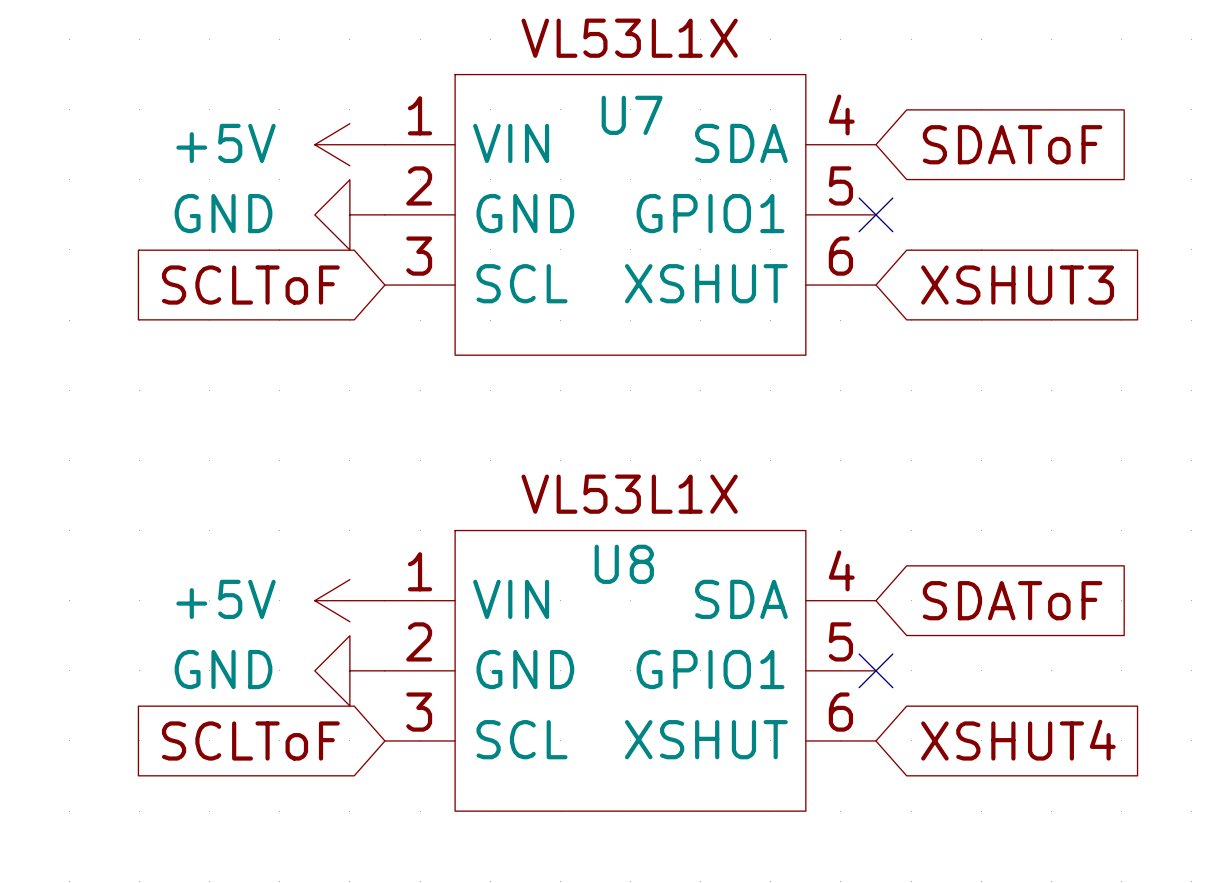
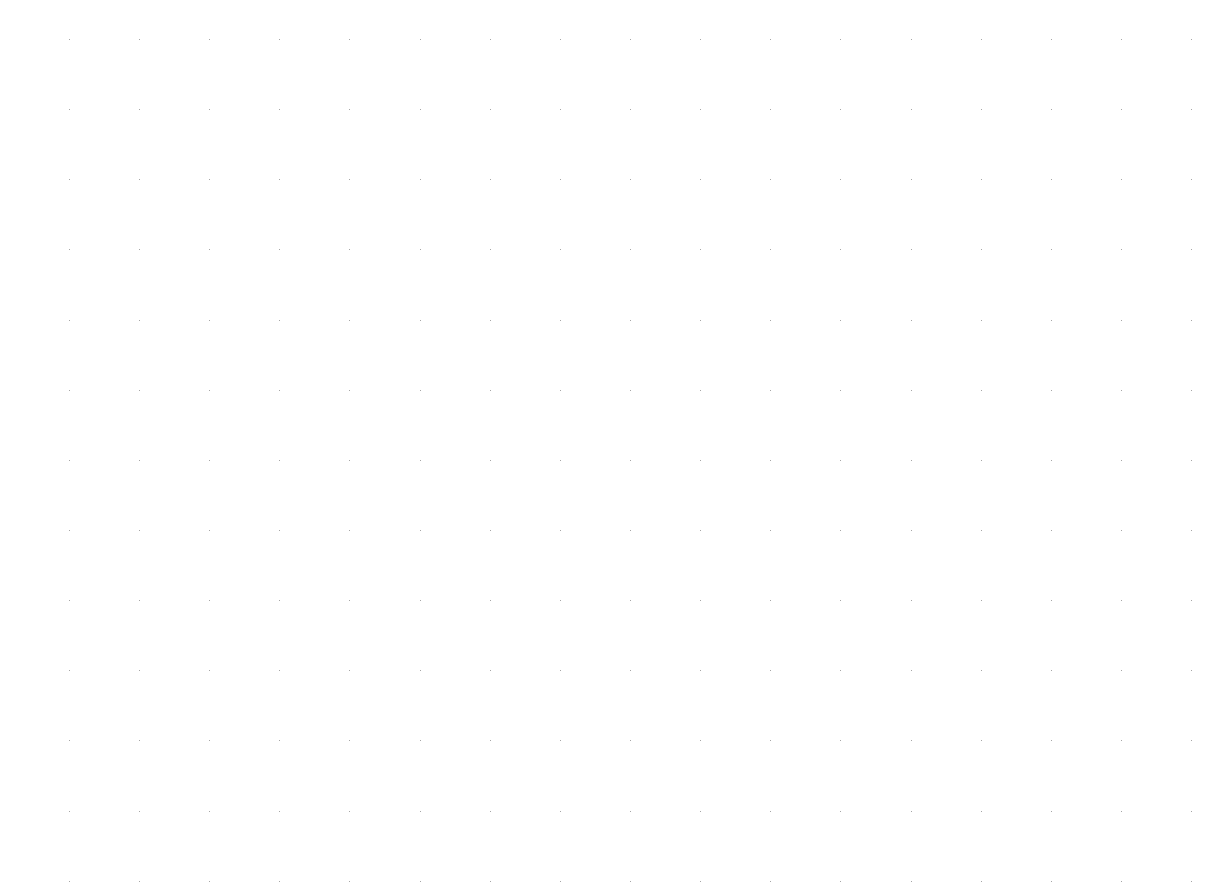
power symbol: +5V (349, 144) -> none
global label: SDAToF (1012, 144) -> none
power symbol: GND (349, 214) -> none
U7: (630, 214) -> none
no-connect mark: (875, 214) -> none
global label: SCLToF (250, 285) -> none
global label: XSHUT3 (1017, 285) -> none
power symbol: +5V (349, 600) -> none
global label: SDAToF (1012, 600) -> none
power symbol: GND (349, 670) -> none
U8: (630, 670) -> none
no-connect mark: (875, 670) -> none
global label: SCLToF (250, 740) -> none
global label: XSHUT4 (1018, 740) -> none

